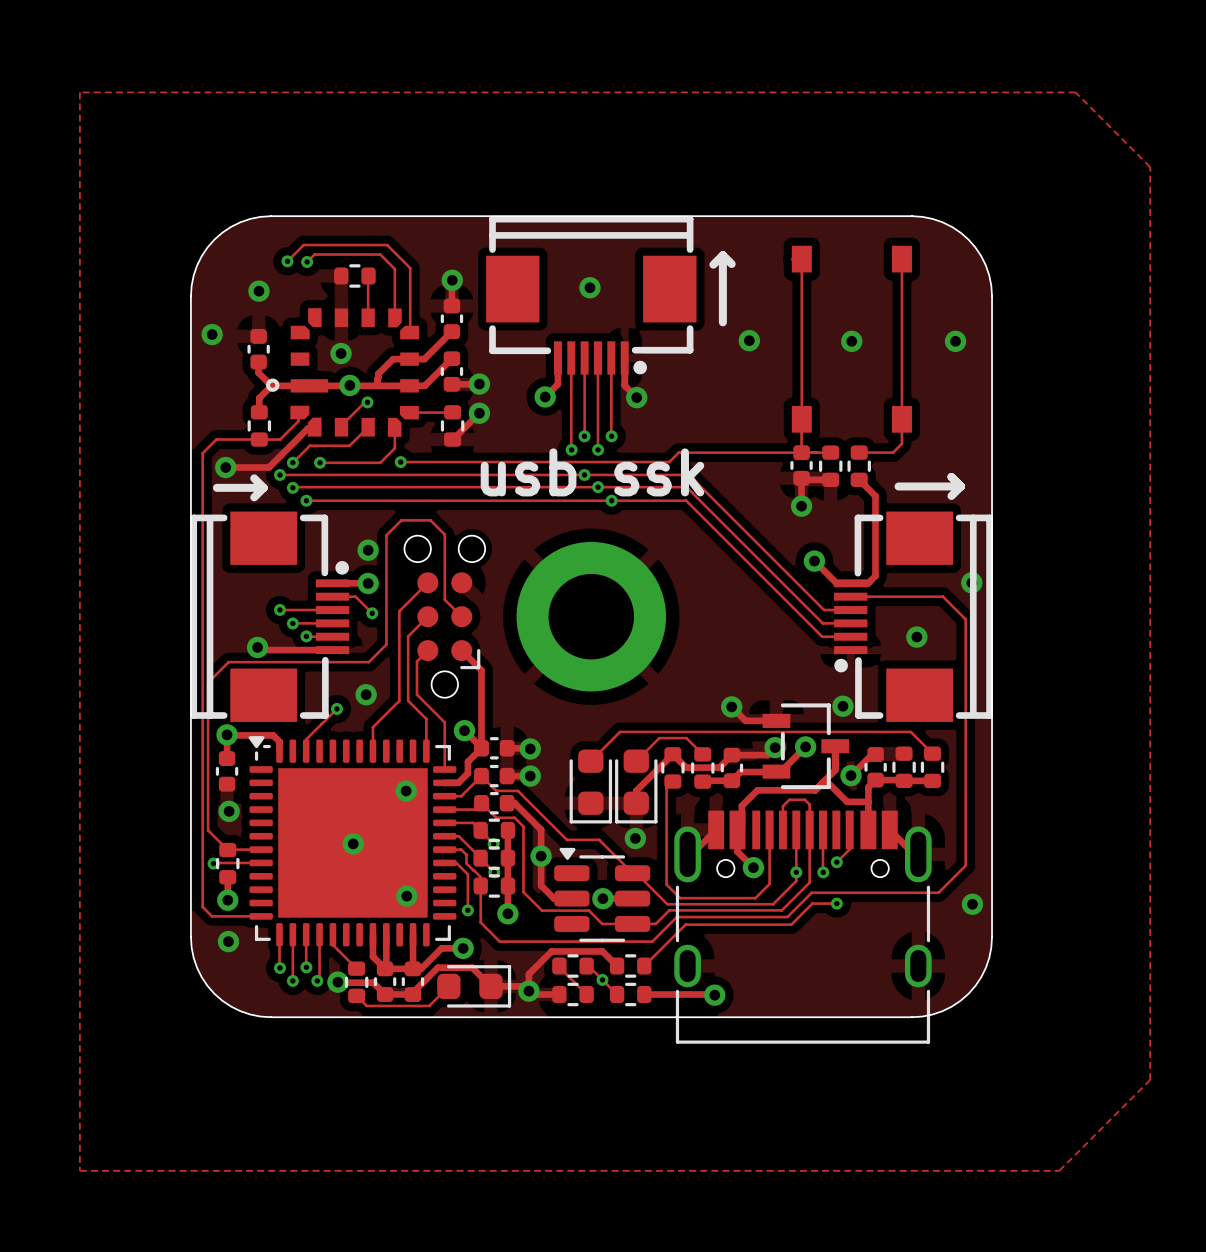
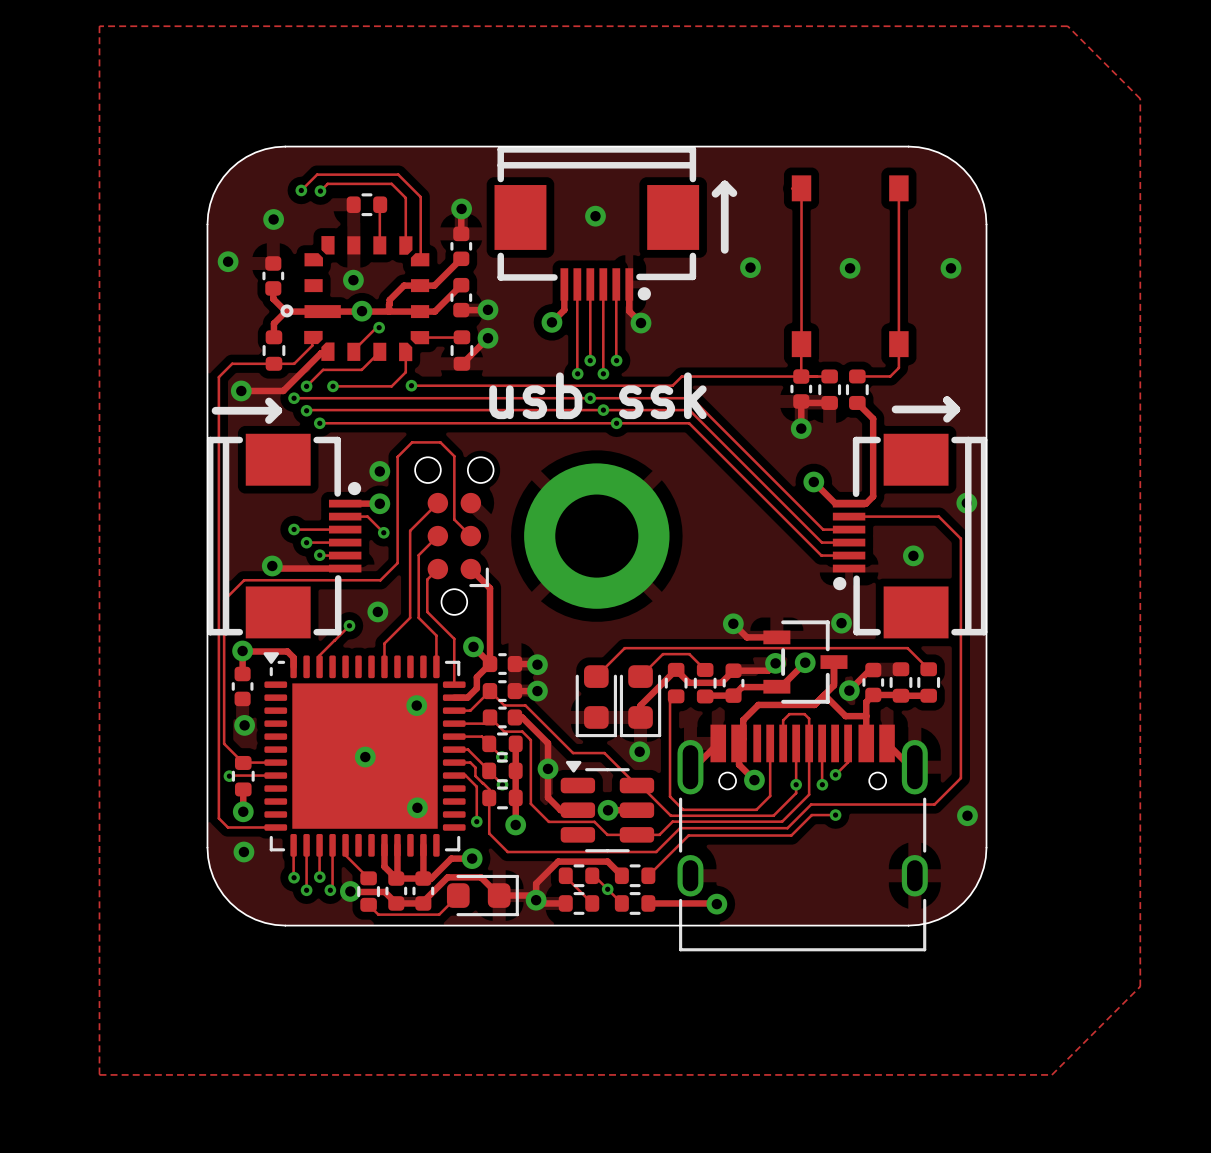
line: none -> (215, 410) (232, 410)

